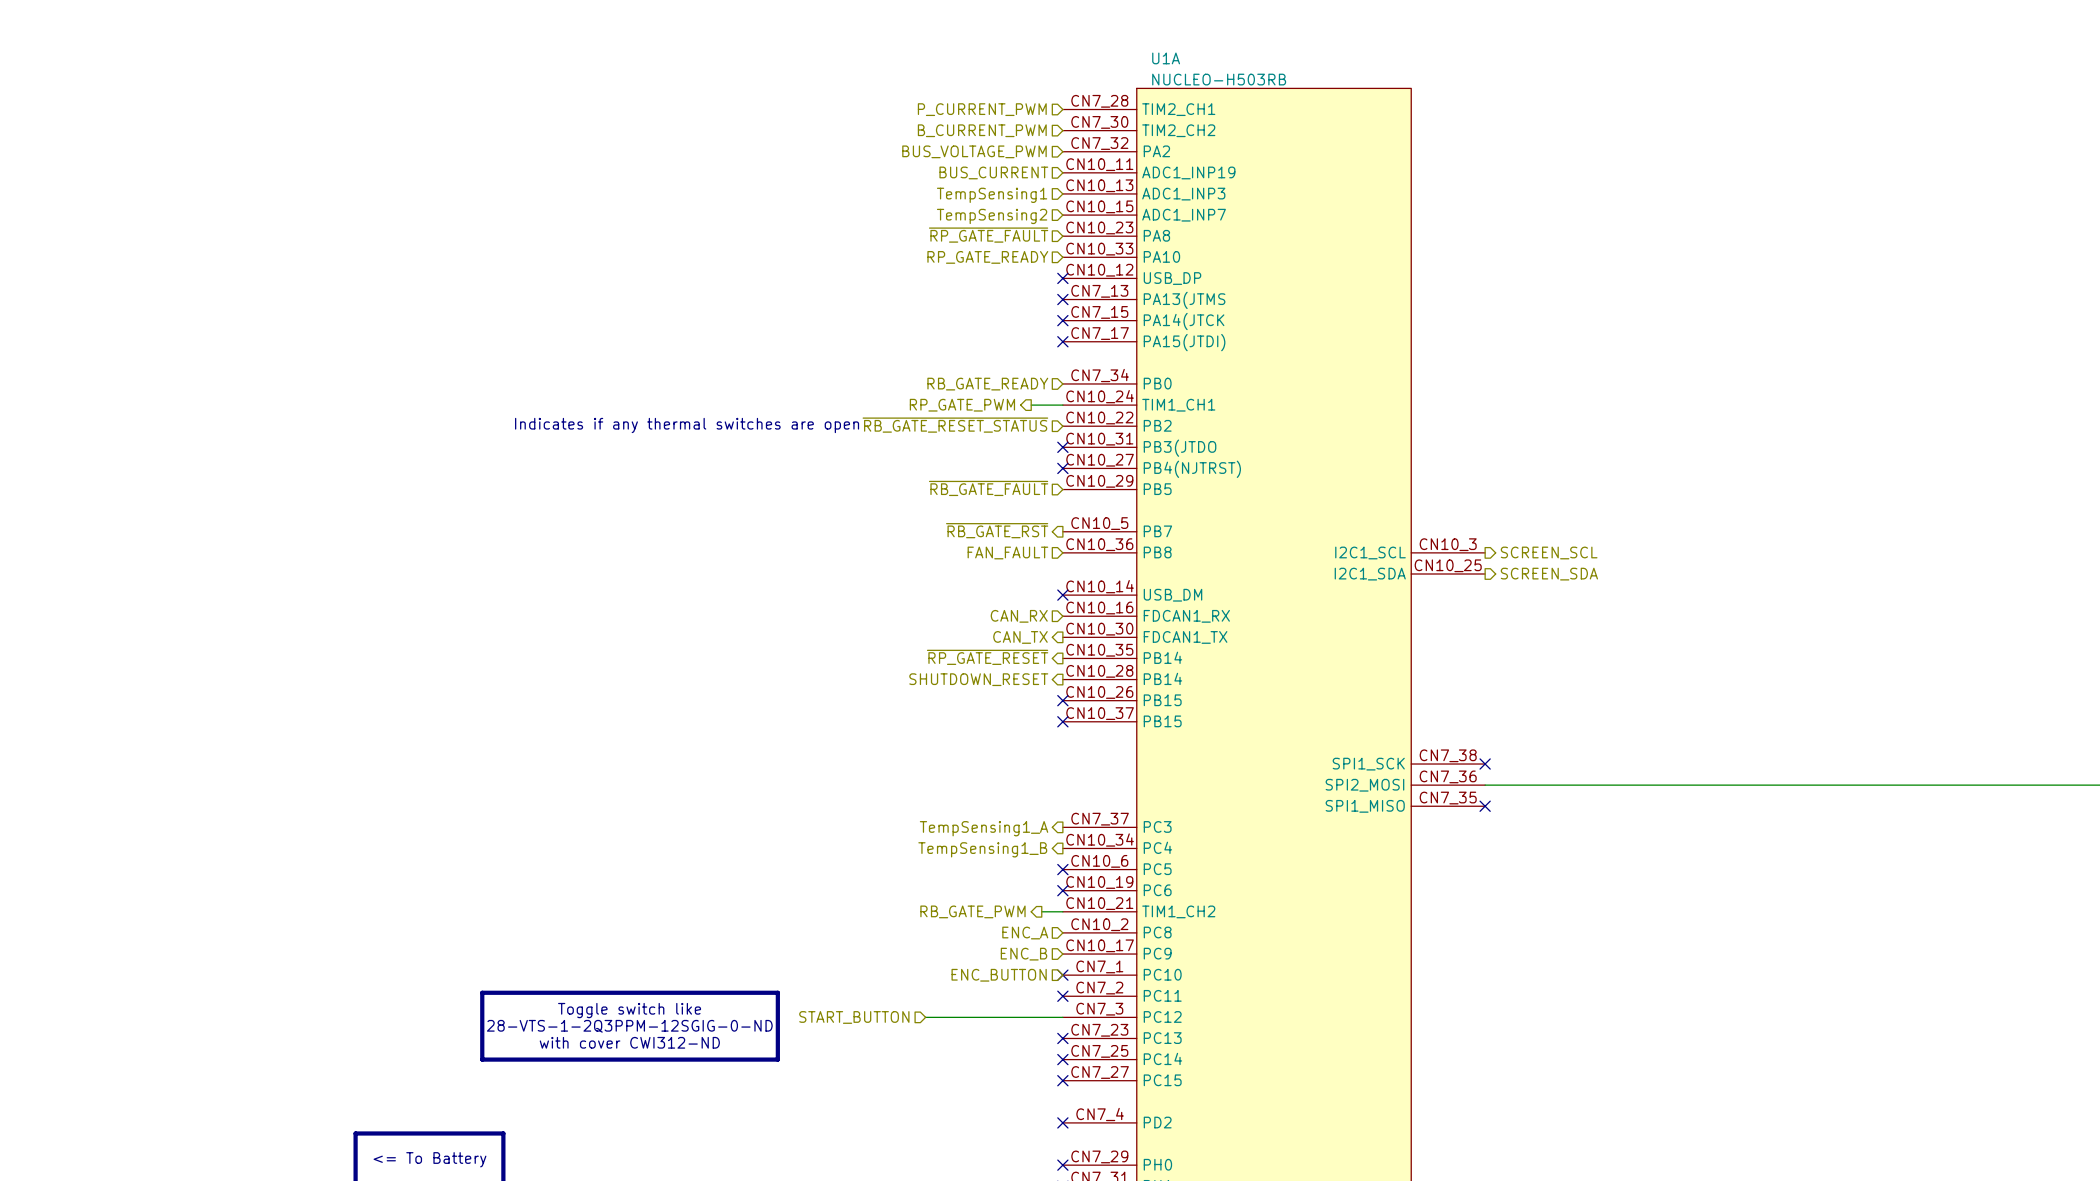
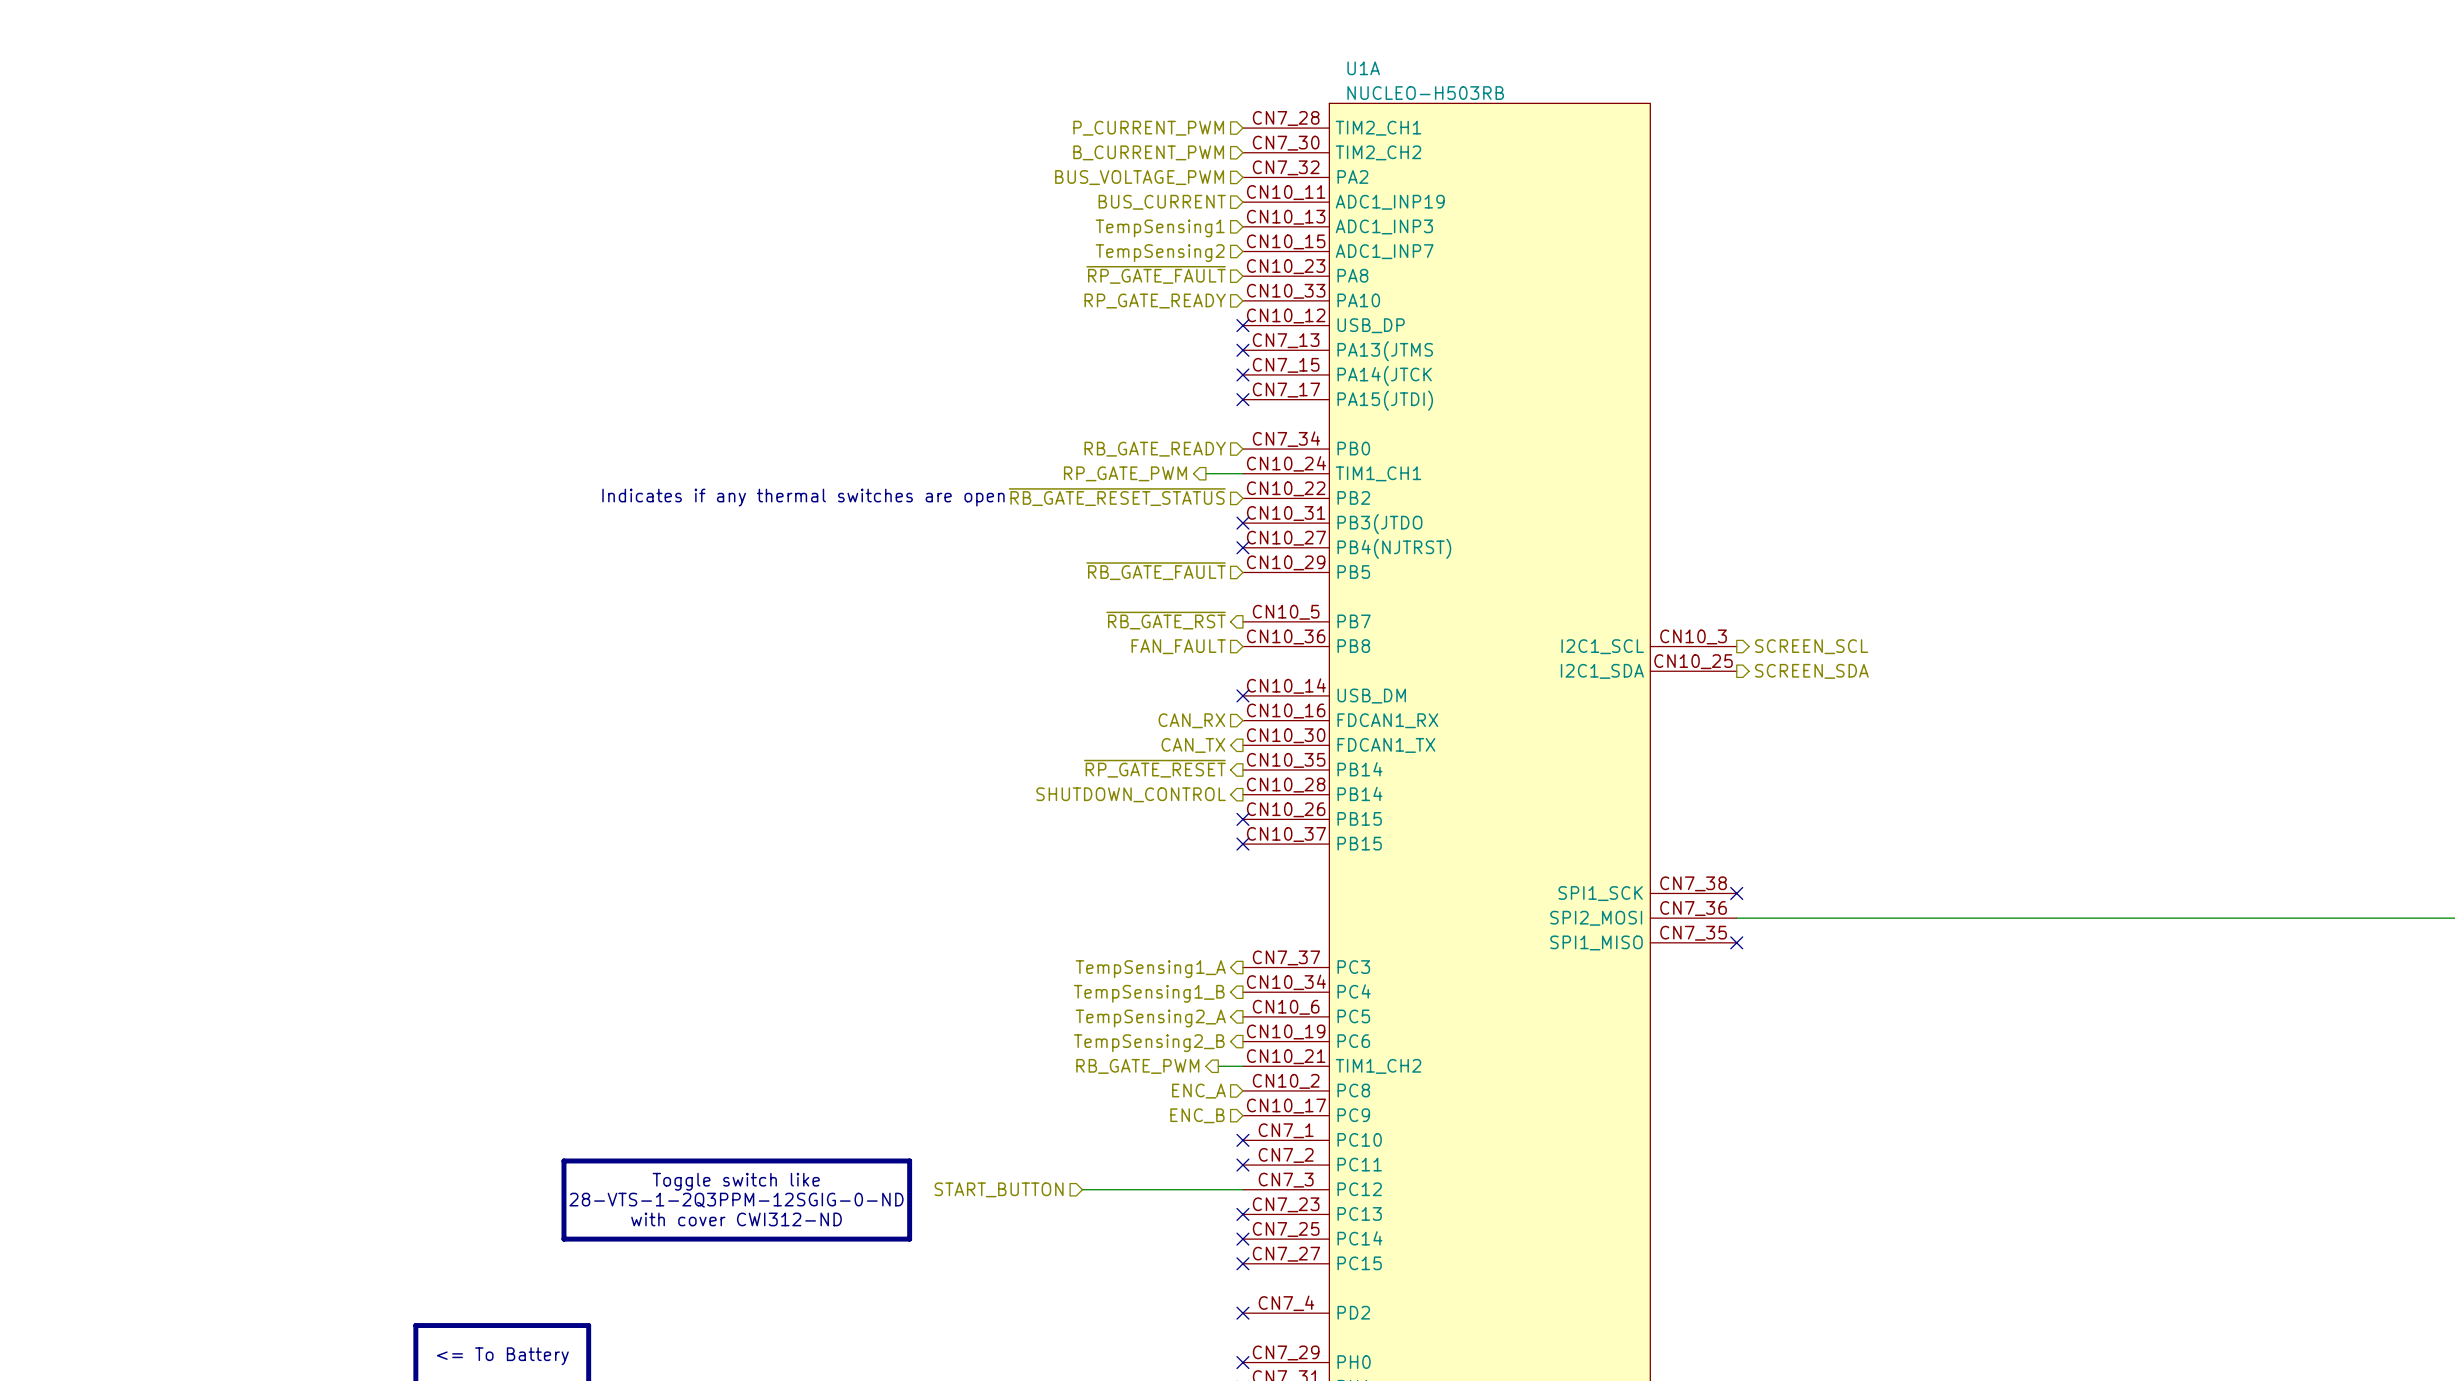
hierarchical label: SHUTDOWN_RESET (978, 679) -> SHUTDOWN_CONTROL (1131, 794)
no-connect mark: (1062, 869) -> none
hierarchical label: none -> TempSensing2_A (1150, 1018)
no-connect mark: (1062, 890) -> none
hierarchical label: none -> TempSensing2_B (1149, 1043)
hierarchical label: ENC_BUTTON (999, 975) -> none

